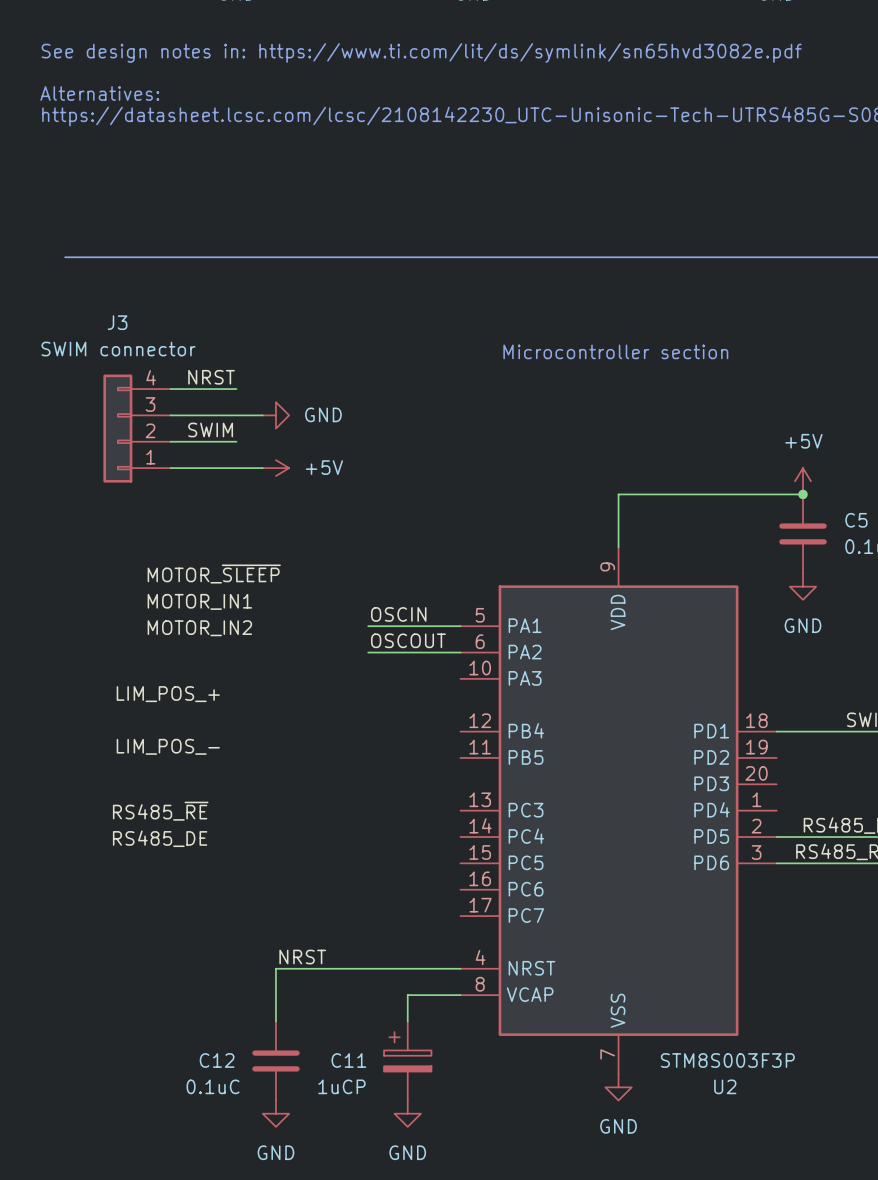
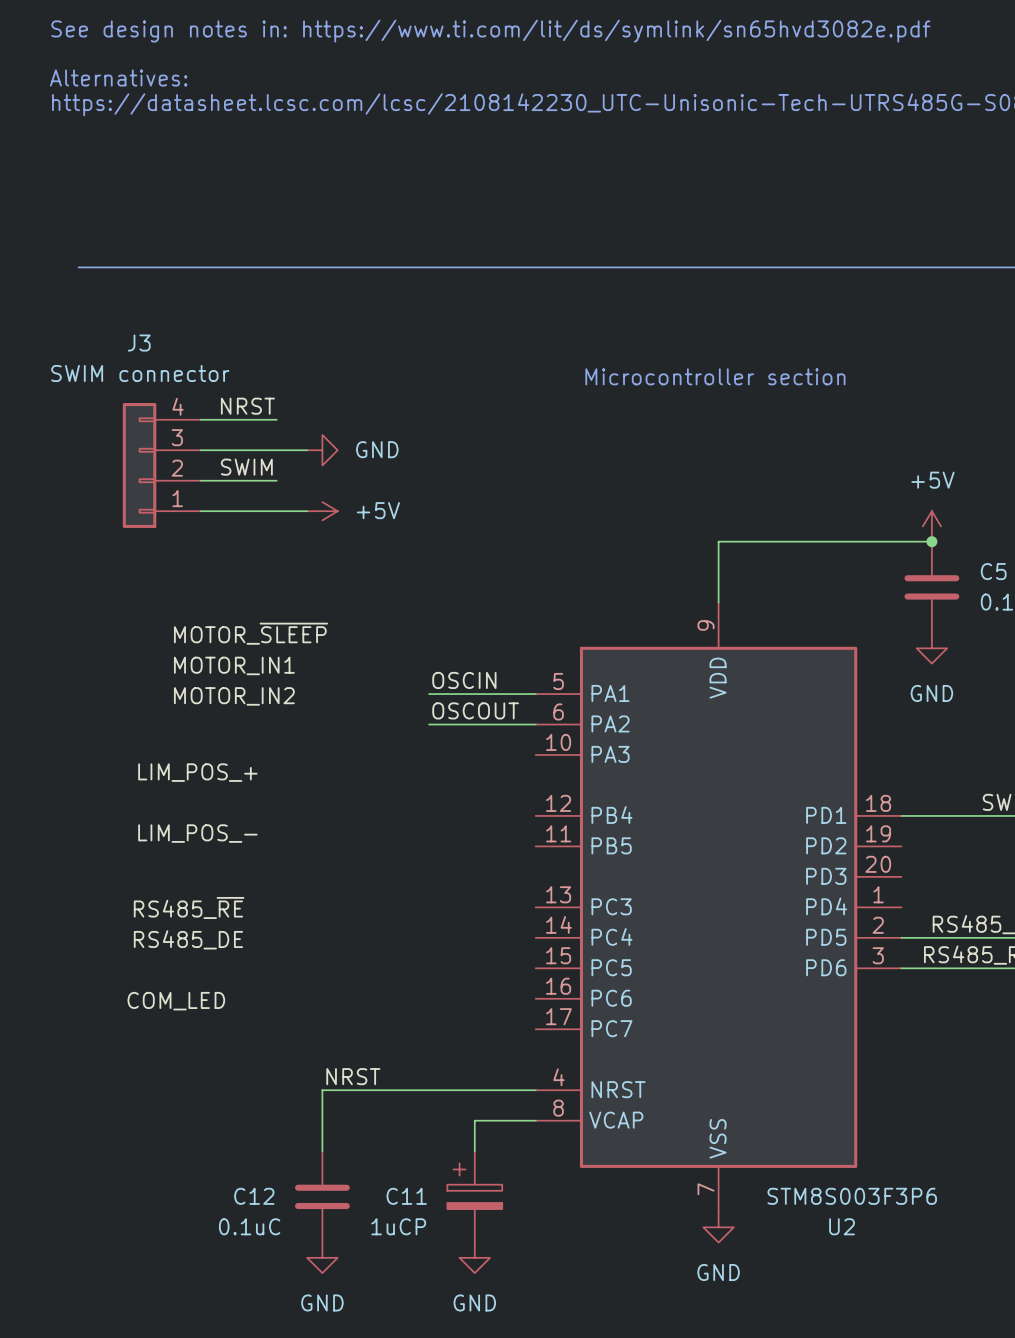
label: none -> COM_LED (176, 1001)
U2 value: STM8S003F3P (727, 1060) -> STM8S003F3P6 (852, 1196)

